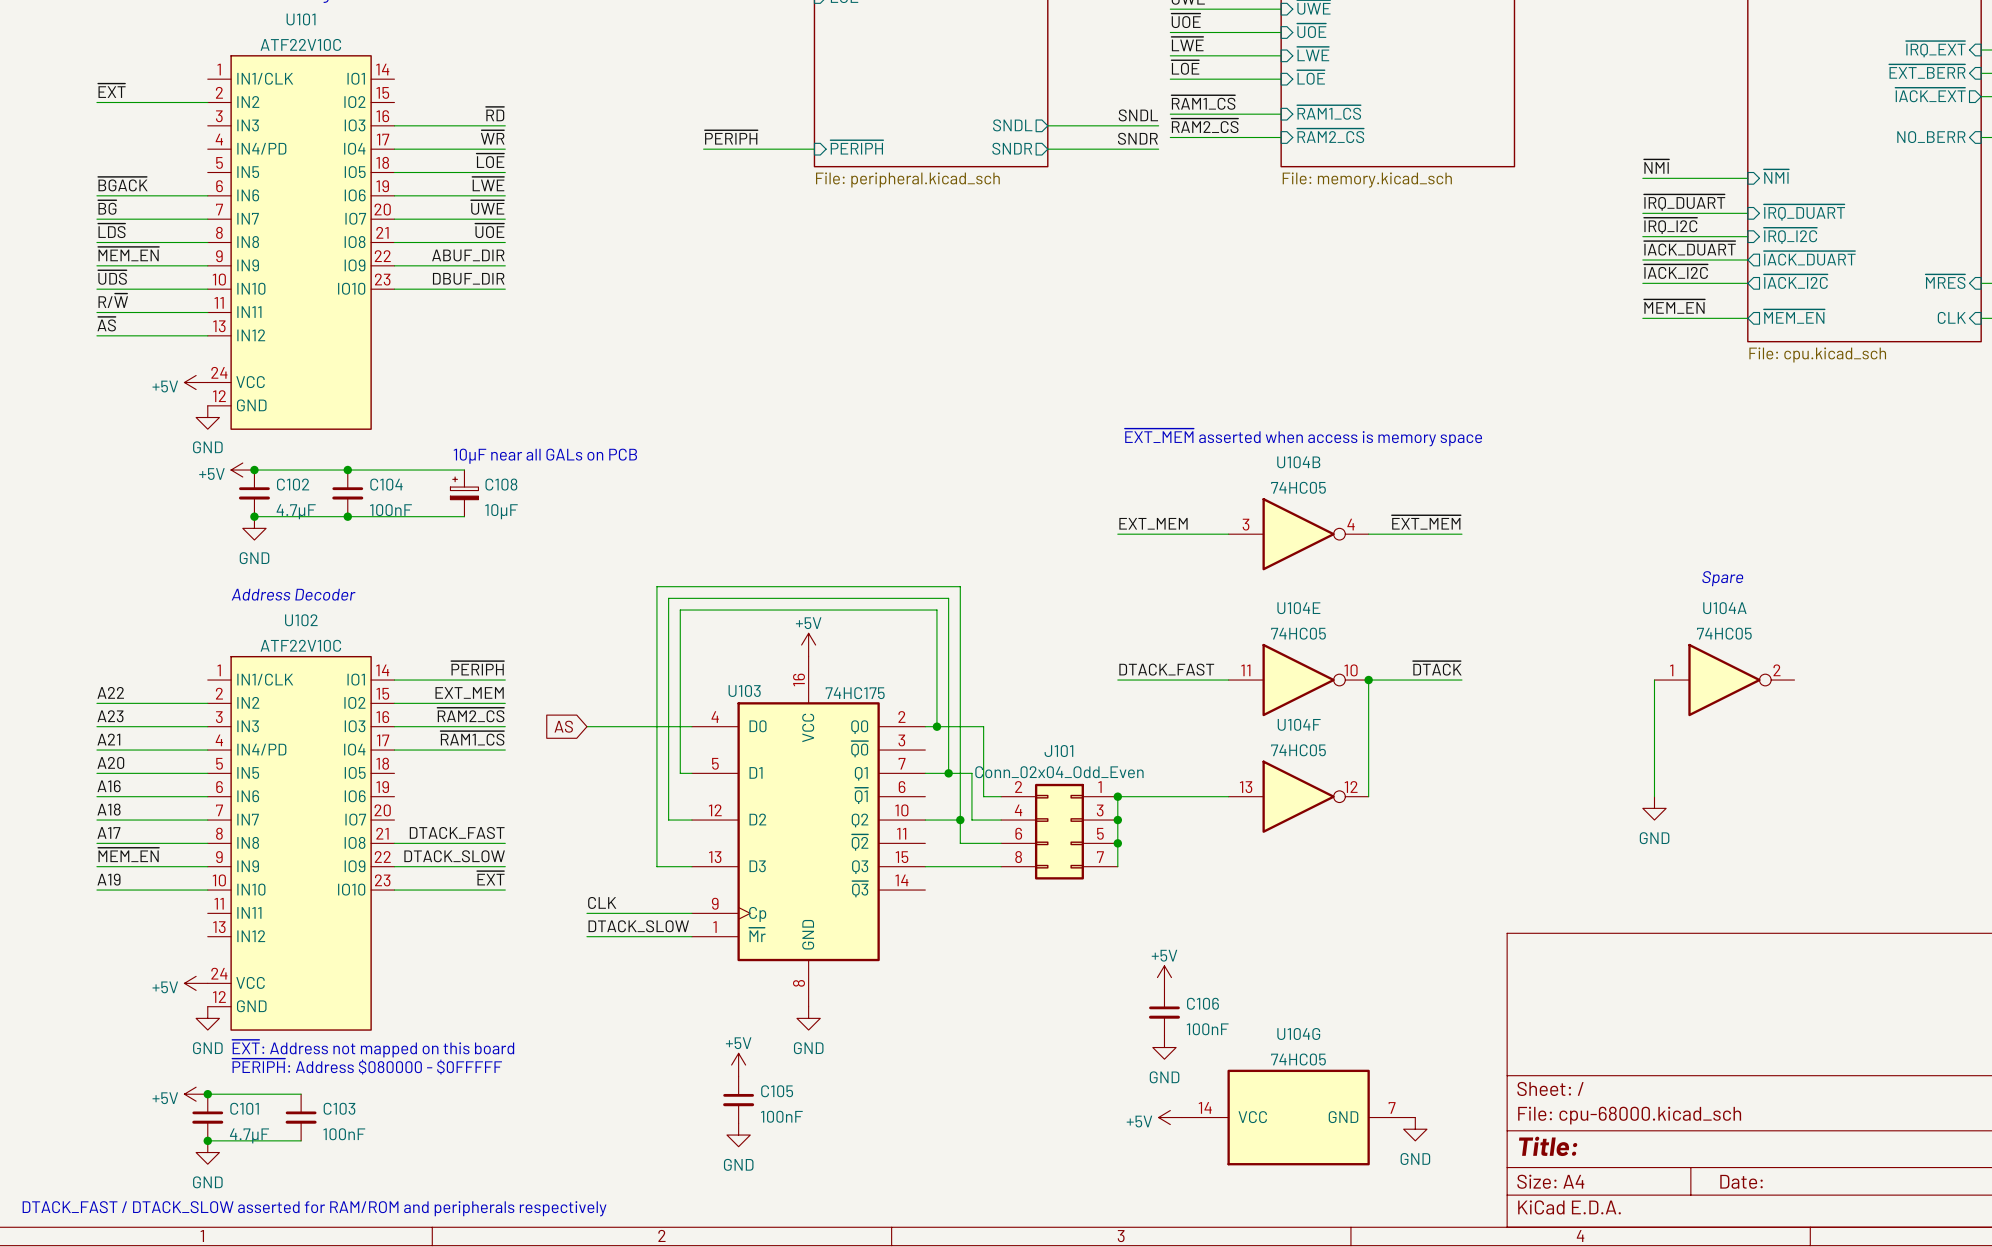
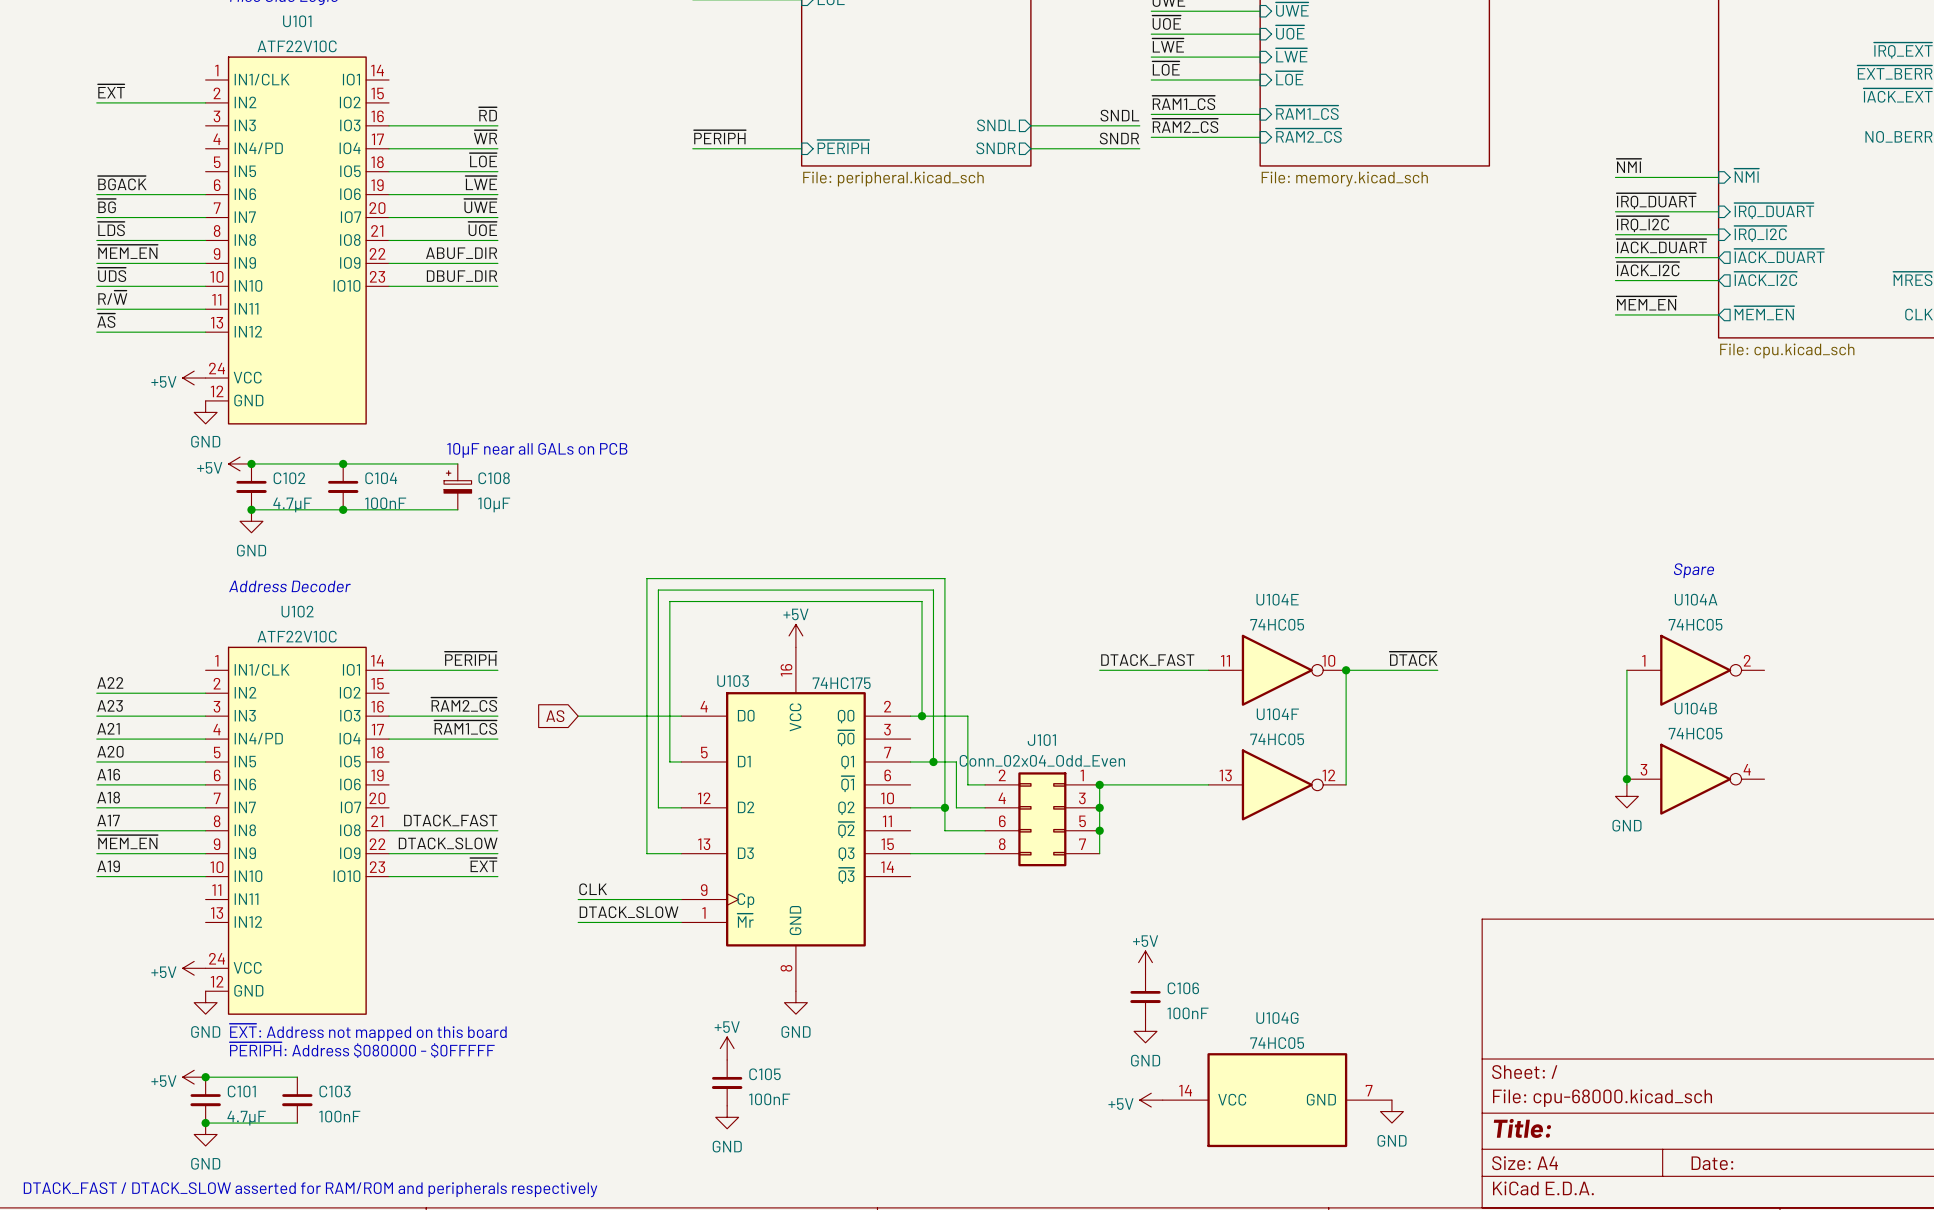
text: ~{EXT_MEM} asserted when access is memory space (1303, 437) -> none
label: ~{EXT_MEM} (1426, 522) -> none
label: EXT_MEM (1153, 523) -> none
wire: (1117, 534) (1228, 534) -> none
U104B position: (1298, 534) -> (1695, 779)
wire: (1368, 534) (1461, 534) -> none
label: EXT_MEM (469, 692) -> none
wire: (394, 703) (505, 703) -> none
junction: none -> (1626, 779)

